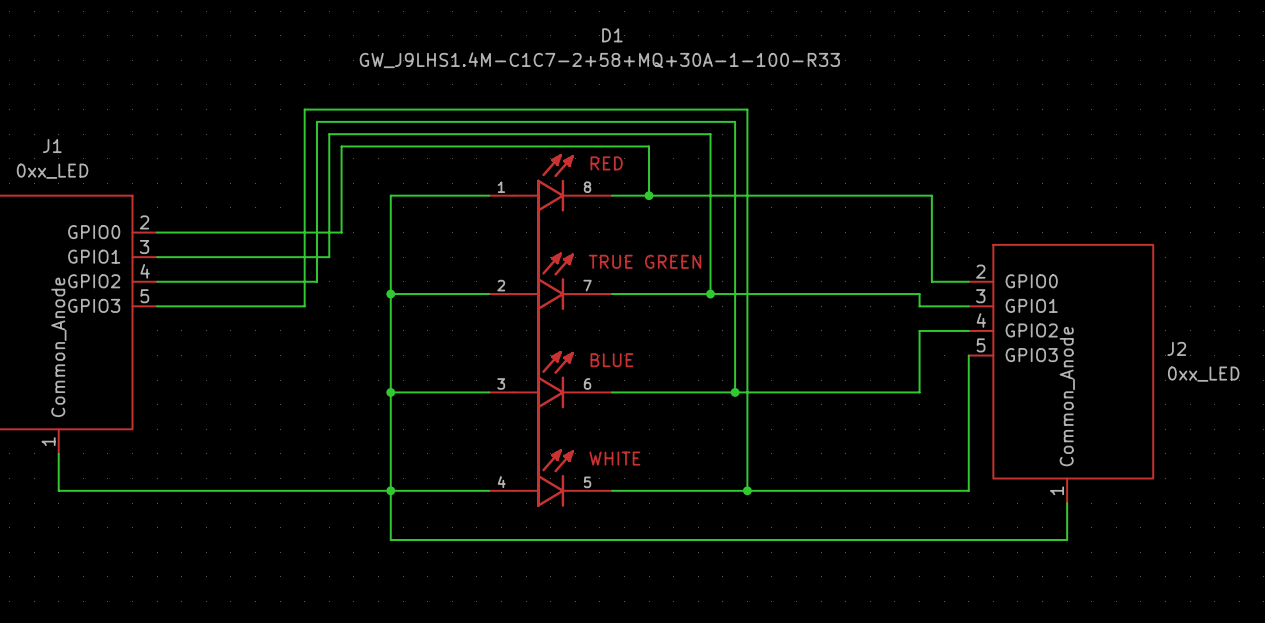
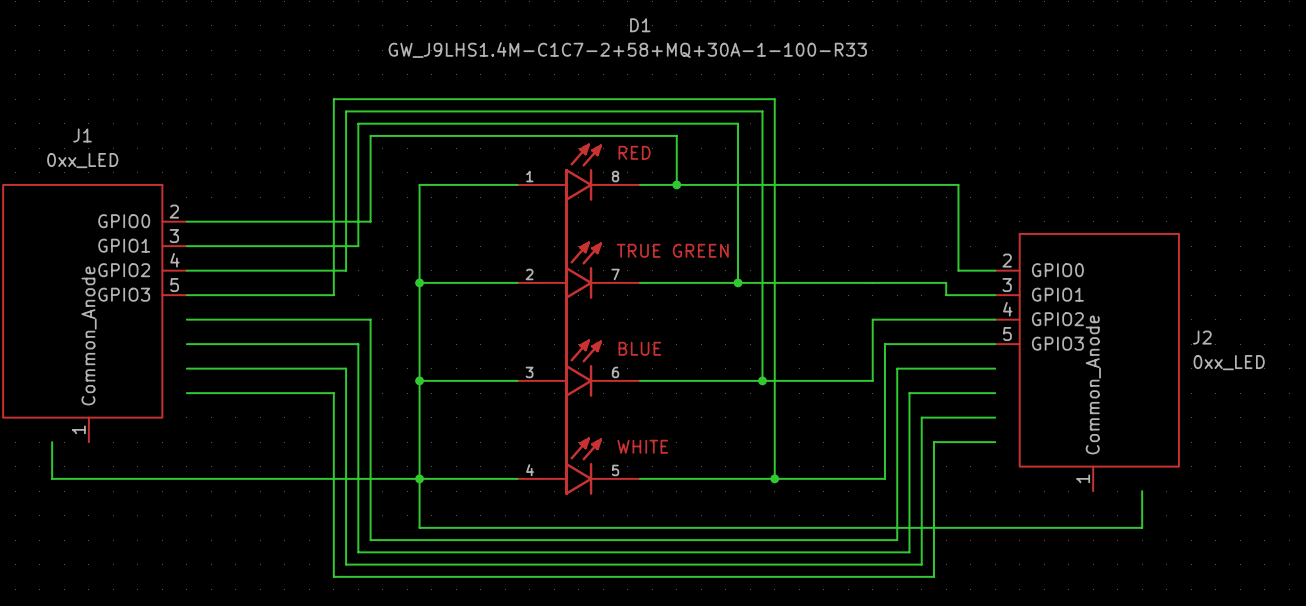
wire: none -> (186, 319) (370, 319) (370, 540) (897, 540) (897, 368) (995, 368)
wire: (919, 330) (919, 392) (845, 392) -> (946, 319) (872, 319) (872, 380)
wire: none -> (186, 344) (358, 344) (358, 552) (909, 552) (909, 393) (995, 393)
wire: (968, 355) (968, 490) (858, 490) -> (995, 344) (884, 344) (884, 478)
wire: none -> (186, 368) (346, 368) (346, 564) (921, 564) (921, 417) (995, 417)
wire: none -> (186, 393) (333, 393) (333, 576) (933, 576) (933, 442) (995, 442)
wire: (58, 453) (58, 490) -> (52, 442) (52, 478) (88, 478)
wire: (1067, 503) (1067, 540) -> (1142, 491) (1142, 527) (1093, 527)

